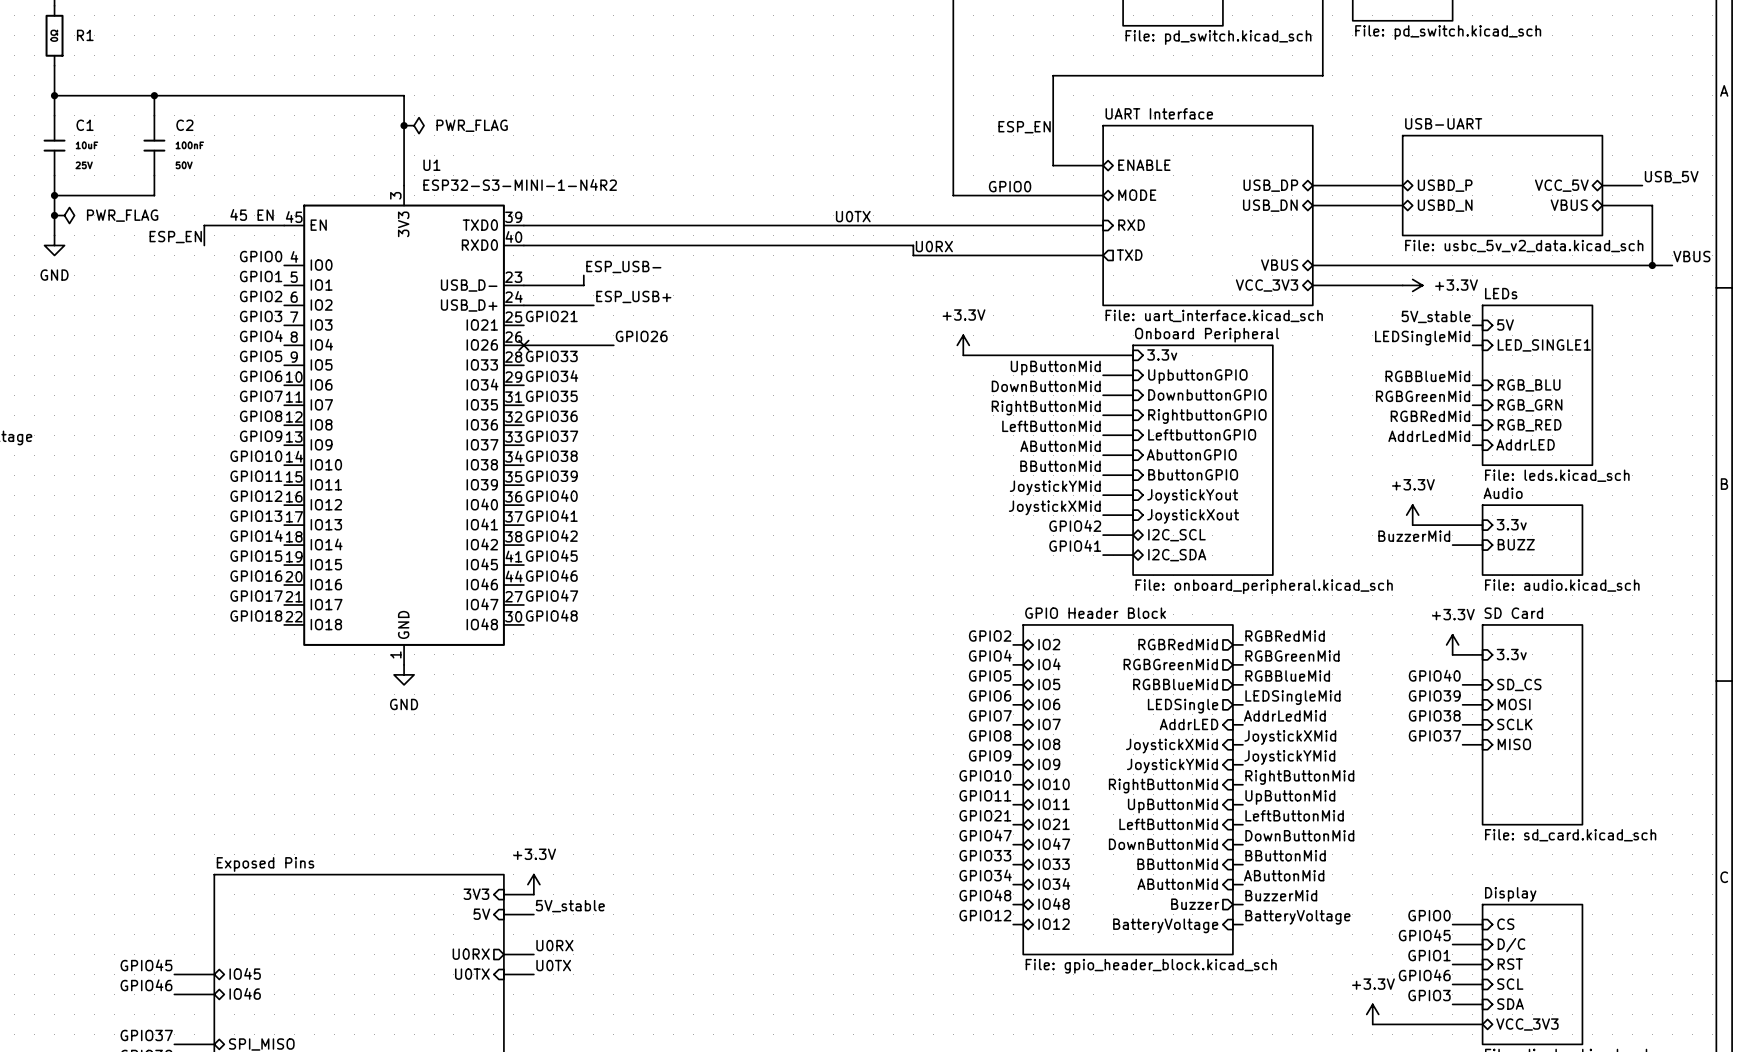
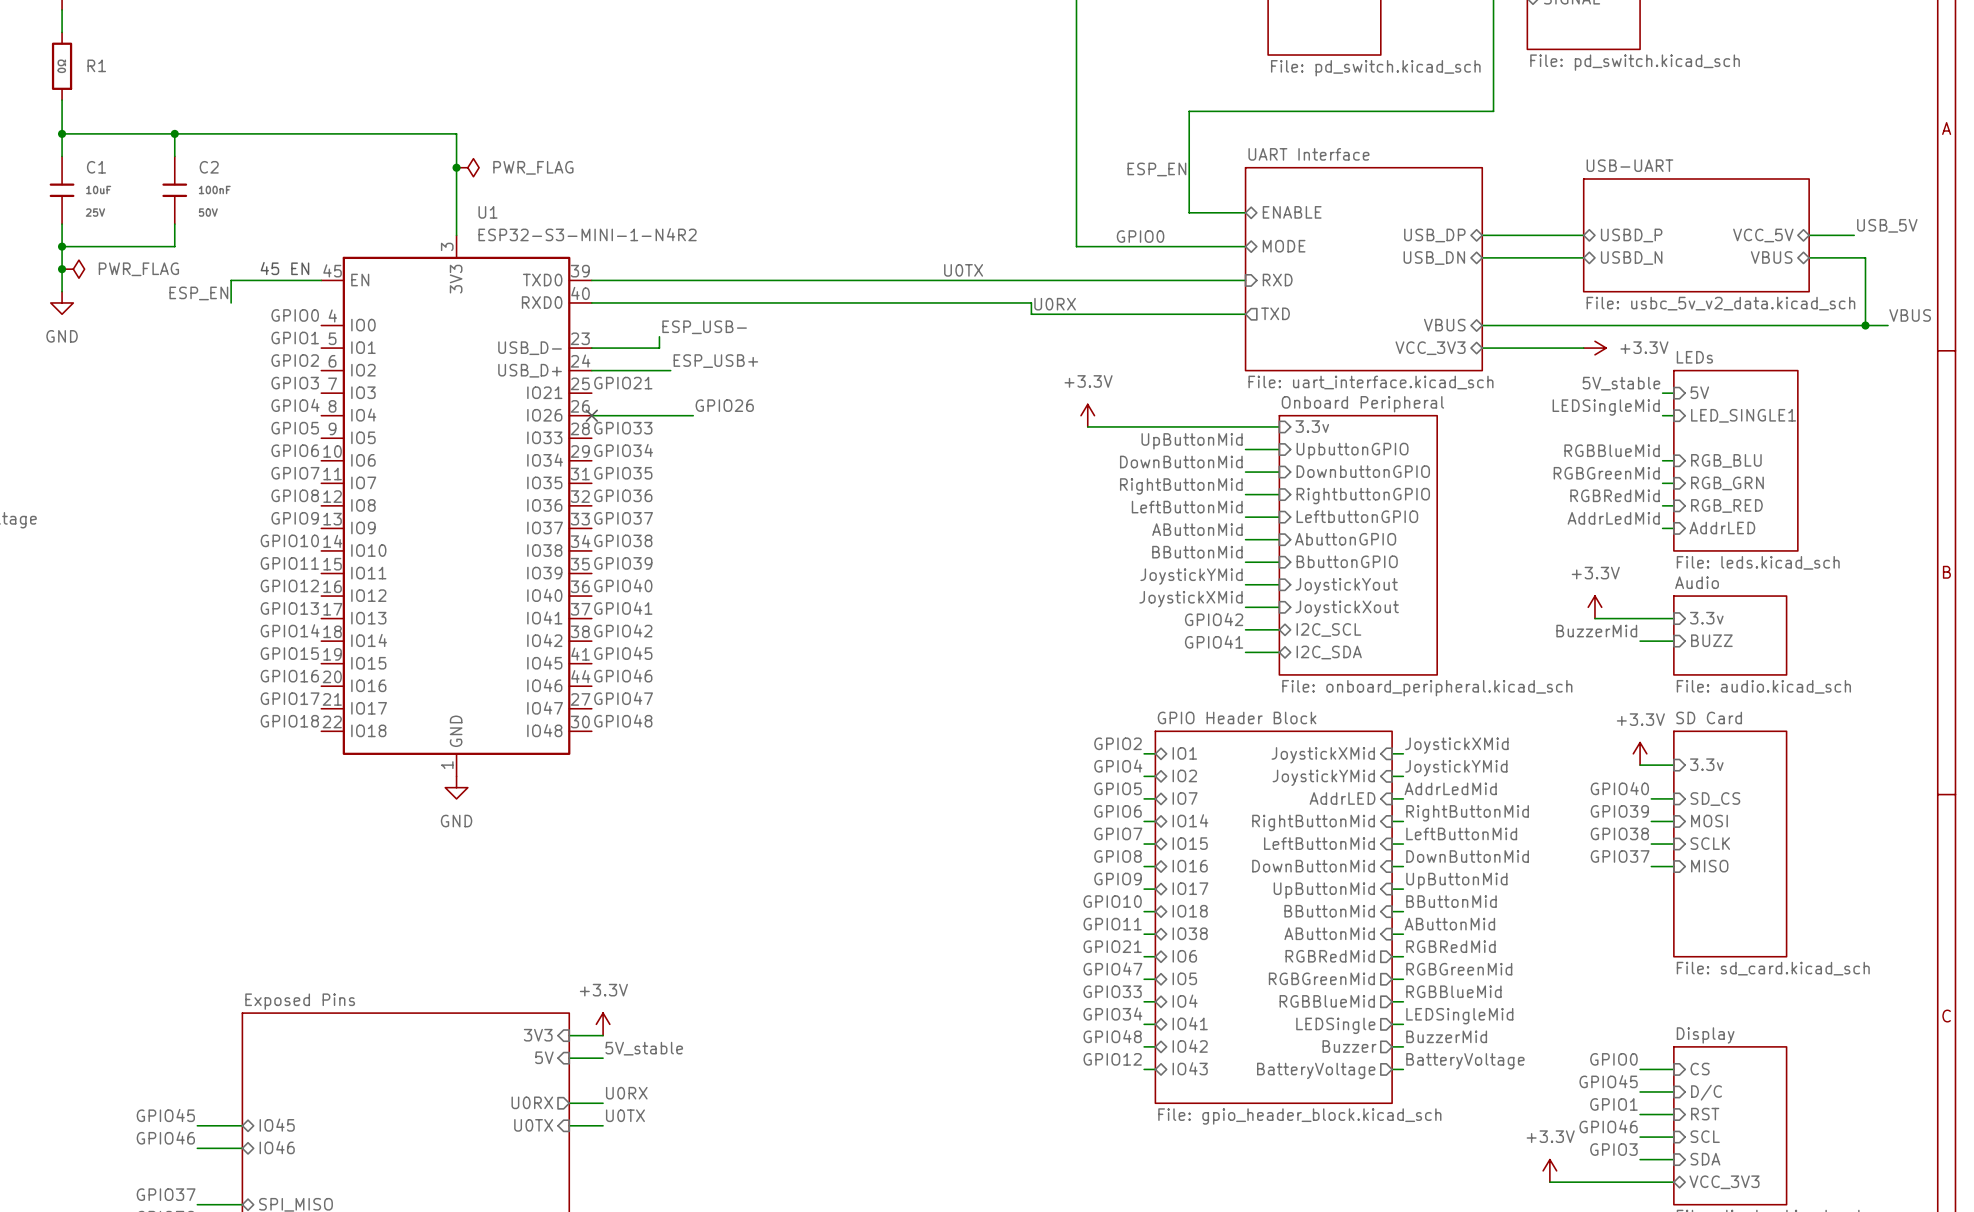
label: RGBRedMid (1285, 636) -> JoystickXMid (1456, 745)
sheet pin: IO2 (1049, 644) -> IO1 (1184, 753)
sheet pin shape: output (1178, 644) -> input (1323, 755)
sheet pin: RGBRedMid (1178, 644) -> JoystickXMid (1323, 755)
label: RGBGreenMid (1292, 656) -> JoystickYMid (1456, 768)
sheet pin: IO4 (1049, 664) -> IO2 (1184, 775)
sheet pin shape: output (1170, 664) -> input (1323, 777)
sheet pin: RGBGreenMid (1170, 664) -> JoystickYMid (1323, 777)
label: RGBBlueMid (1287, 675) -> AddrLedMid (1450, 788)
sheet pin: IO5 (1049, 684) -> IO7 (1185, 798)
sheet pin shape: output (1175, 684) -> input (1342, 798)
sheet pin: RGBBlueMid (1175, 684) -> AddrLED (1342, 798)
label: LEDSingleMid (1292, 697) -> RightButtonMid (1467, 813)
sheet pin: IO6 (1049, 704) -> IO14 (1190, 820)
sheet pin shape: output (1183, 706) -> input (1313, 822)
sheet pin: LEDSingle (1183, 706) -> RightButtonMid (1313, 822)
label: AddrLedMid (1284, 715) -> LeftButtonMid (1461, 833)
sheet pin: IO7 (1049, 724) -> IO15 (1190, 843)
sheet pin: AddrLED (1189, 724) -> LeftButtonMid (1319, 843)
label: JoystickXMid (1290, 737) -> DownButtonMid (1467, 856)
sheet pin: IO8 (1049, 744) -> IO16 (1190, 866)
sheet pin: JoystickXMid (1171, 746) -> DownButtonMid (1313, 866)
label: JoystickYMid (1289, 757) -> UpButtonMid (1456, 880)
sheet pin: IO9 (1049, 764) -> IO17 (1190, 888)
sheet pin: JoystickYMid (1172, 766) -> UpButtonMid (1324, 890)
label: RightButtonMid (1299, 777) -> BButtonMid (1451, 901)
sheet pin: IO10 (1054, 784) -> IO18 (1190, 911)
sheet pin: RightButtonMid (1163, 786) -> BButtonMid (1329, 911)
label: UpButtonMid (1290, 797) -> AButtonMid (1449, 924)
sheet pin: IO11 (1054, 804) -> IO38 (1190, 933)
sheet pin: UpButtonMid (1172, 806) -> AButtonMid (1329, 933)
label: LeftButtonMid (1294, 815) -> RGBRedMid (1450, 946)
sheet pin: IO21 (1054, 824) -> IO6 (1184, 956)
sheet pin shape: input (1168, 824) -> output (1330, 956)
sheet pin: LeftButtonMid (1168, 824) -> RGBRedMid (1330, 956)
label: DownButtonMid (1299, 835) -> RGBGreenMid (1459, 969)
sheet pin: IO47 (1054, 844) -> IO5 (1184, 978)
sheet pin shape: input (1163, 844) -> output (1321, 978)
sheet pin: DownButtonMid (1163, 844) -> RGBGreenMid (1321, 978)
label: BButtonMid (1285, 855) -> RGBBlueMid (1453, 991)
sheet pin: IO33 (1054, 864) -> IO4 (1185, 1001)
sheet pin shape: input (1177, 864) -> output (1327, 1001)
sheet pin: BButtonMid (1177, 864) -> RGBBlueMid (1327, 1001)
label: AButtonMid (1284, 875) -> LEDSingleMid (1459, 1016)
sheet pin: IO34 (1054, 884) -> IO41 (1190, 1023)
sheet pin shape: input (1177, 884) -> output (1335, 1025)
sheet pin: AButtonMid (1177, 884) -> LEDSingle (1335, 1025)
sheet pin: IO48 (1054, 903) -> IO42 (1190, 1046)
sheet pin: IO12 (1054, 924) -> IO43 (1190, 1068)
sheet pin shape: input (1165, 925) -> output (1316, 1070)

